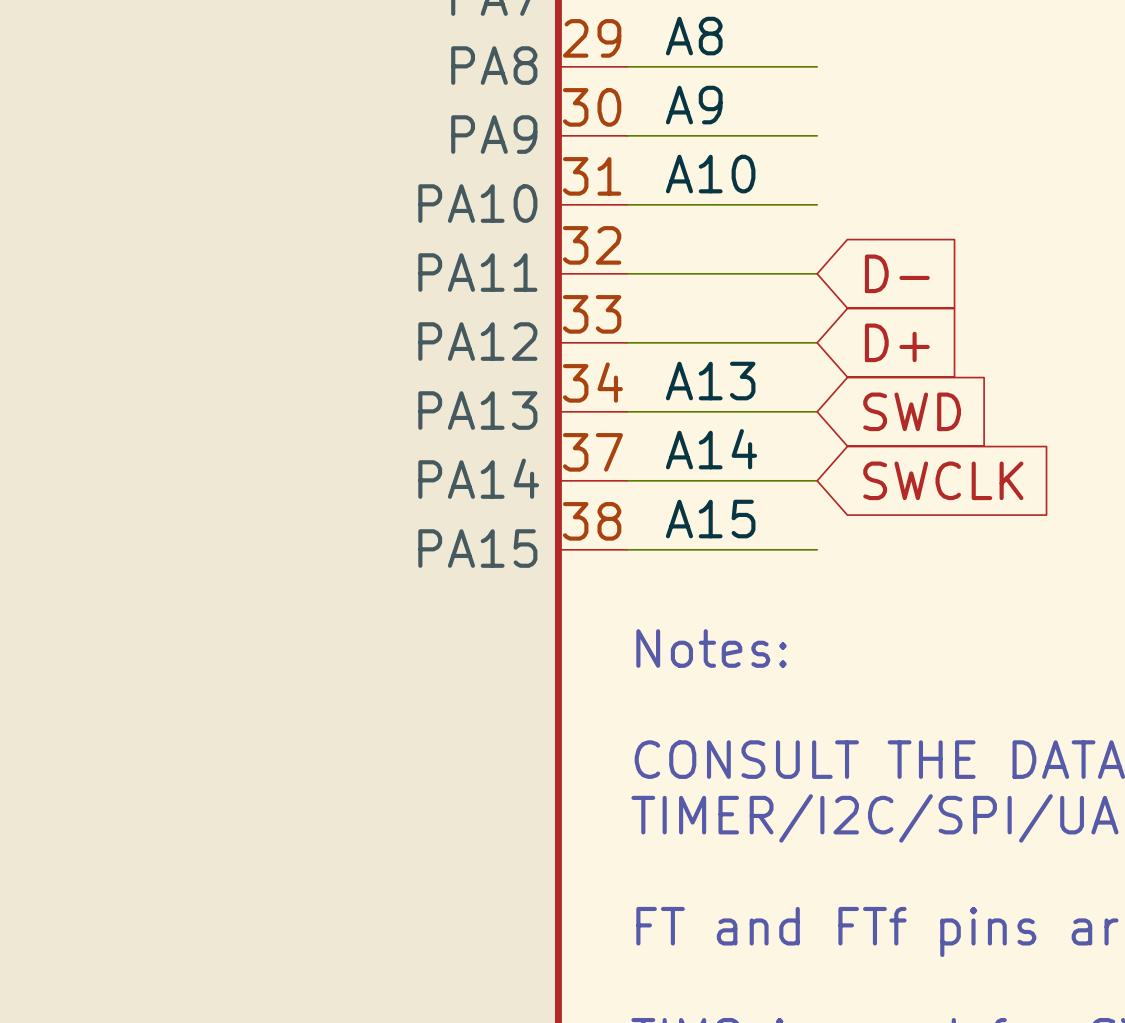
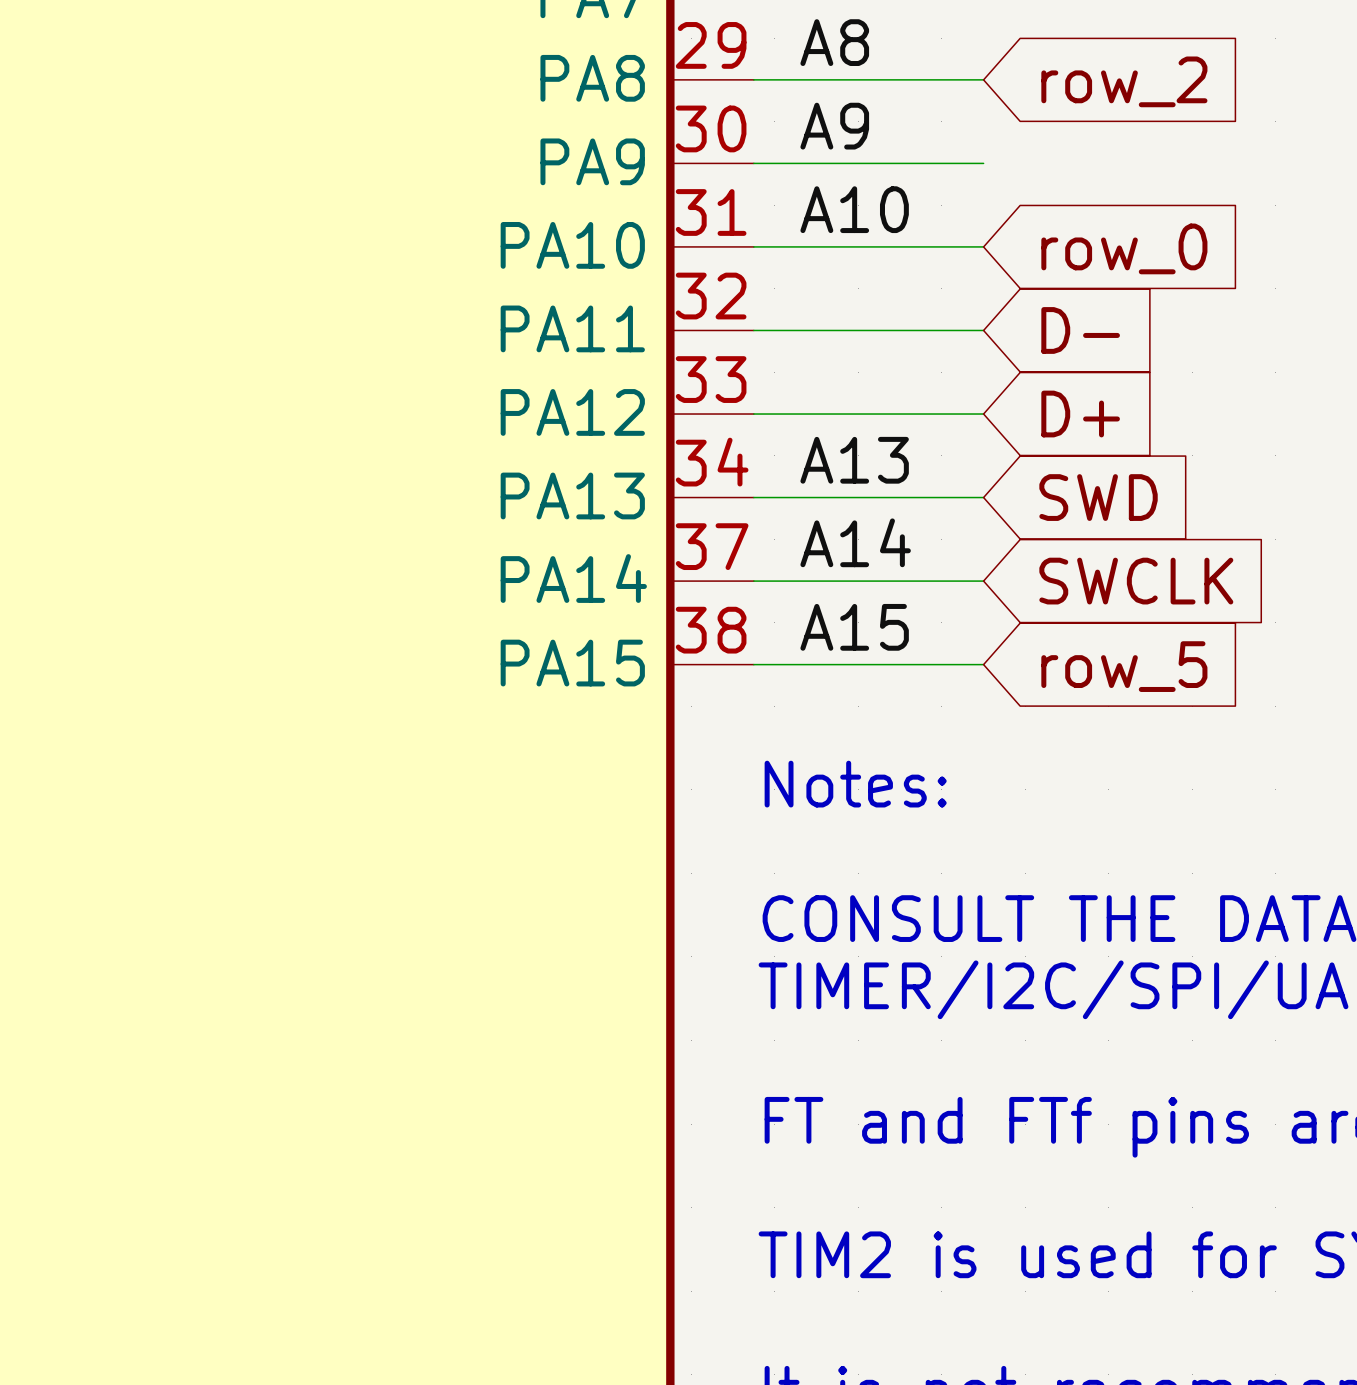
global label: none -> row_2 (1124, 81)
global label: none -> row_0 (1124, 248)
global label: none -> row_5 (1124, 666)

